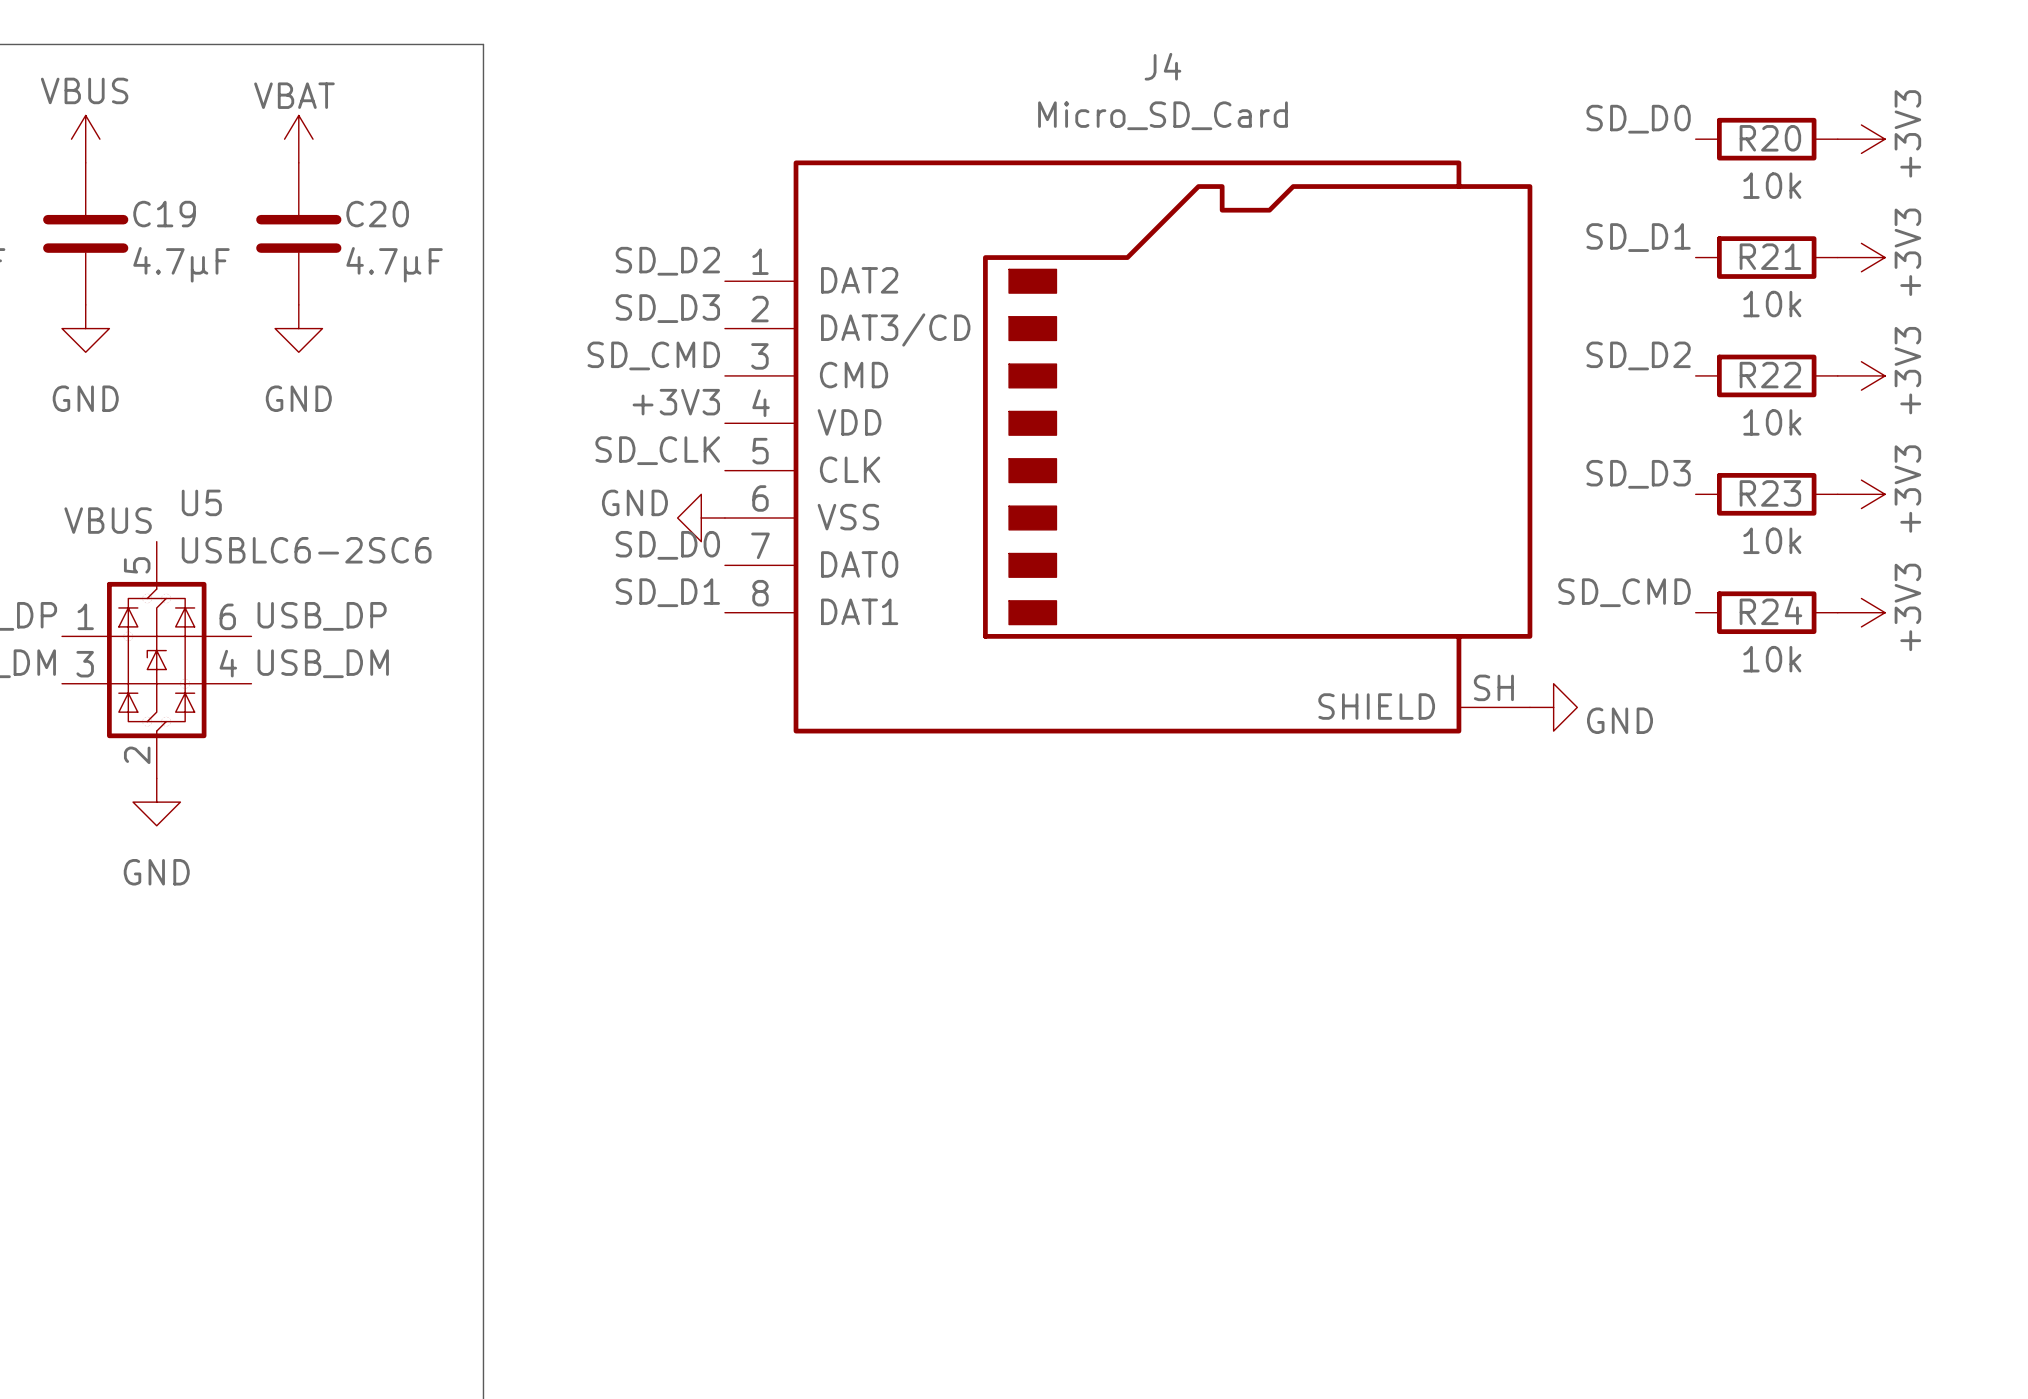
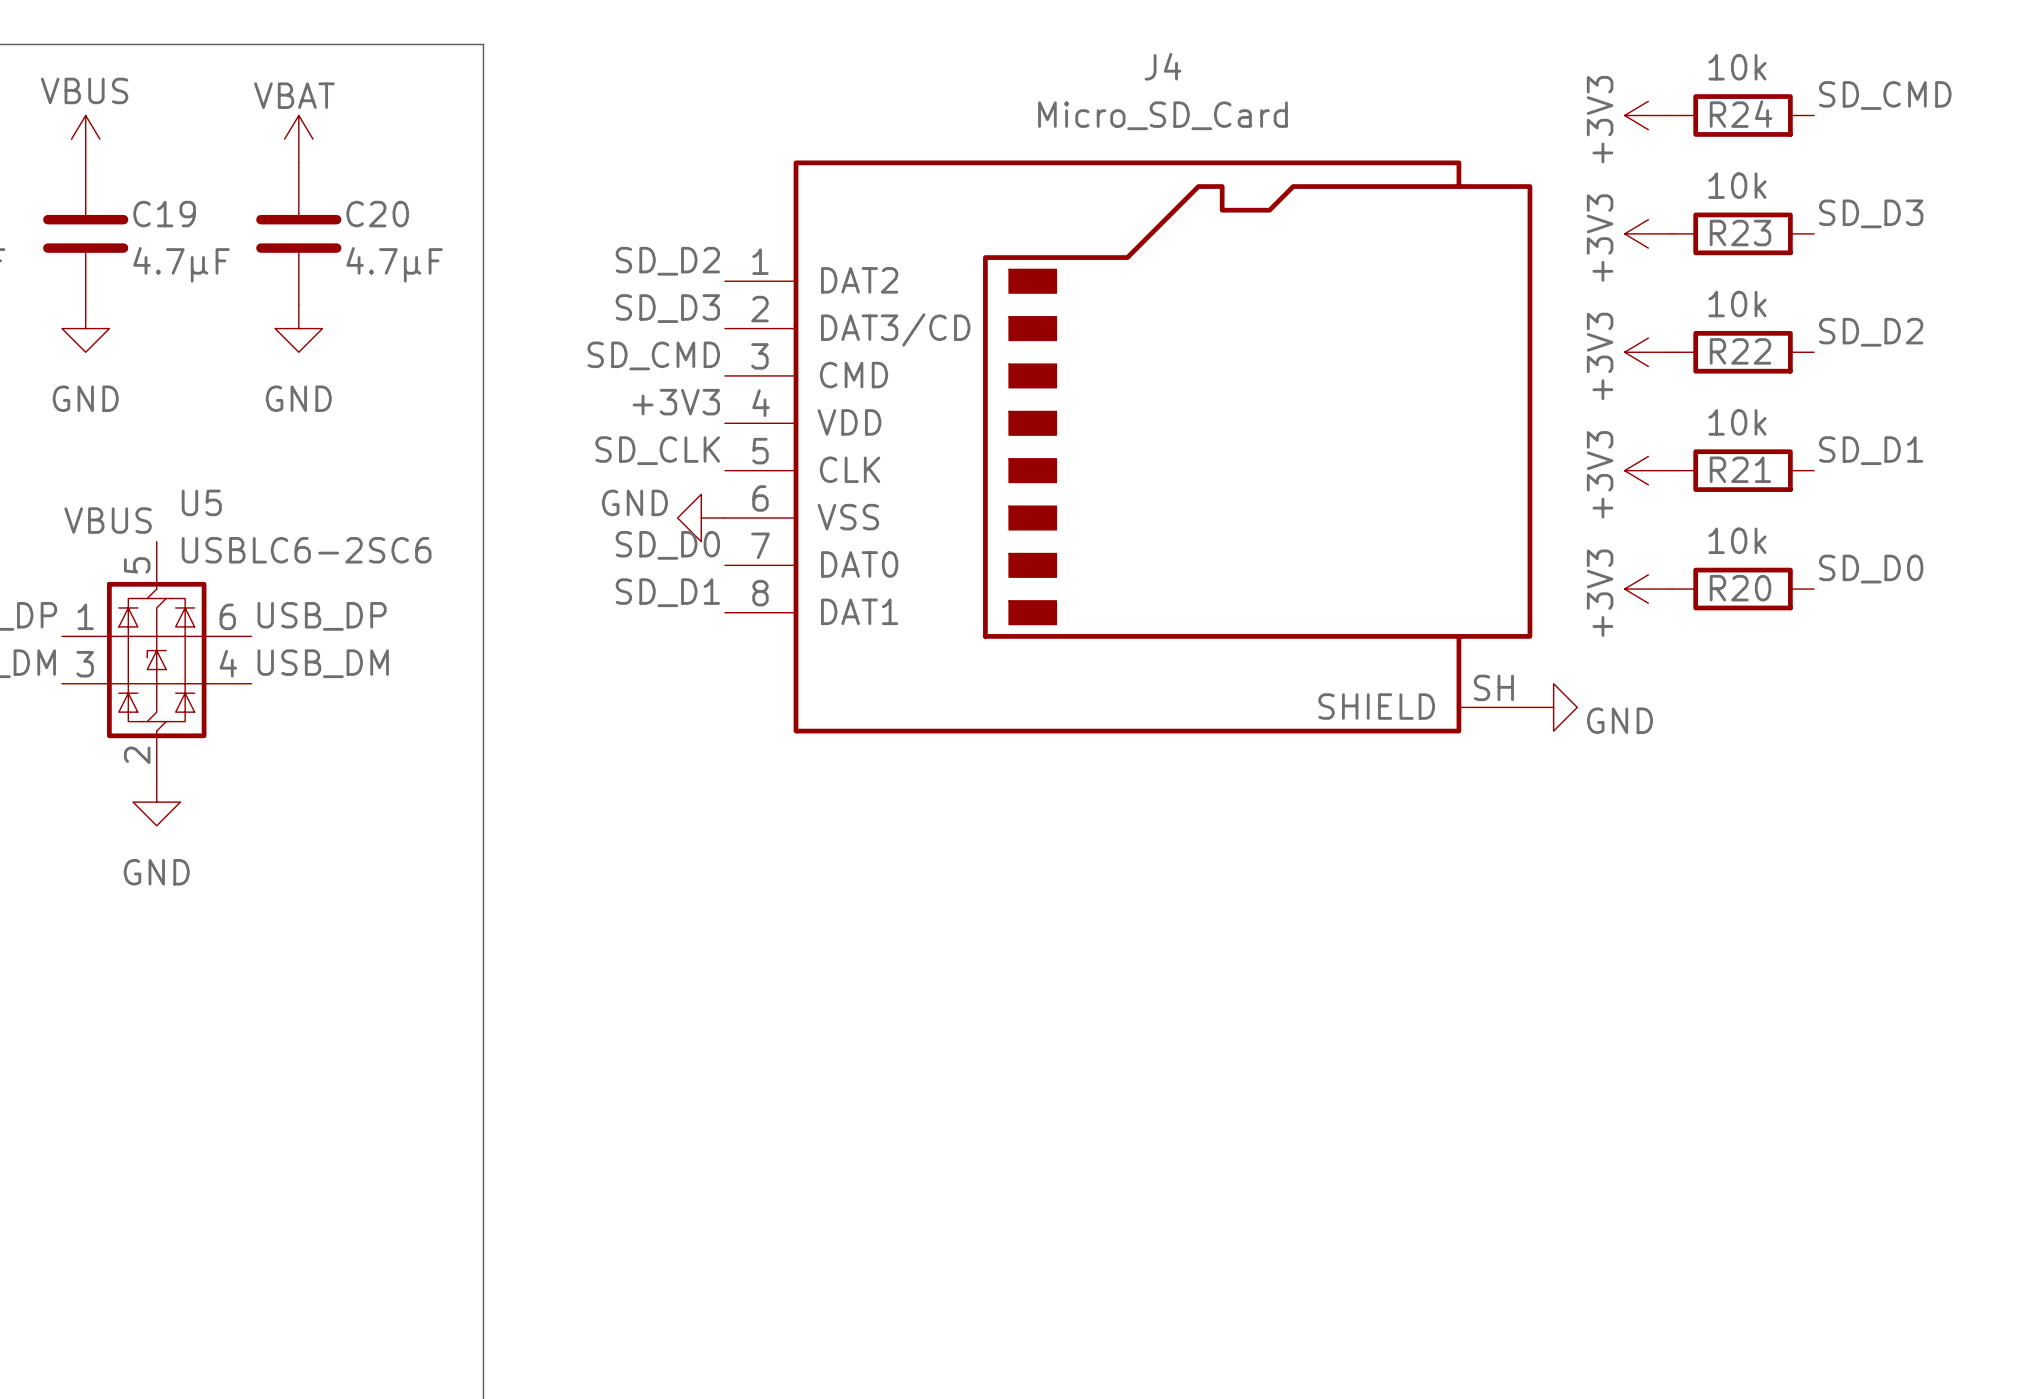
label: none -> SD_CMD (1885, 95)
power symbol: none -> +3V3 (1648, 115)
label position: SD_D0 (1638, 119) -> SD_D0 (1871, 569)
R20 name position: R20 (1770, 138) -> R20 (1740, 588)
R20 position: (1766, 139) -> (1743, 589)
power symbol: +3V3 (1861, 139) -> none
R20 value position: 10k (1772, 185) -> 10k (1737, 540)
power symbol: none -> +3V3 (1648, 233)
label position: SD_D1 (1638, 237) -> SD_D1 (1871, 450)
R21 name position: R21 (1770, 256) -> R21 (1740, 469)
R21 position: (1766, 257) -> (1743, 470)
power symbol: +3V3 (1861, 257) -> none
R21 value position: 10k (1772, 304) -> 10k (1737, 422)
power symbol: none -> +3V3 (1648, 352)
label position: SD_D2 (1638, 355) -> SD_D2 (1871, 332)
R22 position: (1766, 375) -> (1743, 352)
R22 name position: R22 (1770, 375) -> R22 (1740, 351)
power symbol: +3V3 (1861, 375) -> none
R22 value position: 10k (1772, 422) -> 10k (1737, 304)
power symbol: none -> +3V3 (1648, 470)
label position: SD_D3 (1638, 474) -> SD_D3 (1871, 213)
R23 name position: R23 (1770, 493) -> R23 (1740, 233)
R23 position: (1766, 494) -> (1743, 233)
power symbol: +3V3 (1861, 494) -> none
R23 value position: 10k (1772, 540) -> 10k (1737, 185)
power symbol: none -> +3V3 (1648, 589)
label: SD_CMD (1624, 592) -> none
R24 name position: R24 (1770, 611) -> R24 (1741, 114)
R24 position: (1766, 612) -> (1743, 115)
power symbol: +3V3 (1861, 612) -> none
R24 value position: 10k (1772, 659) -> 10k (1737, 67)

